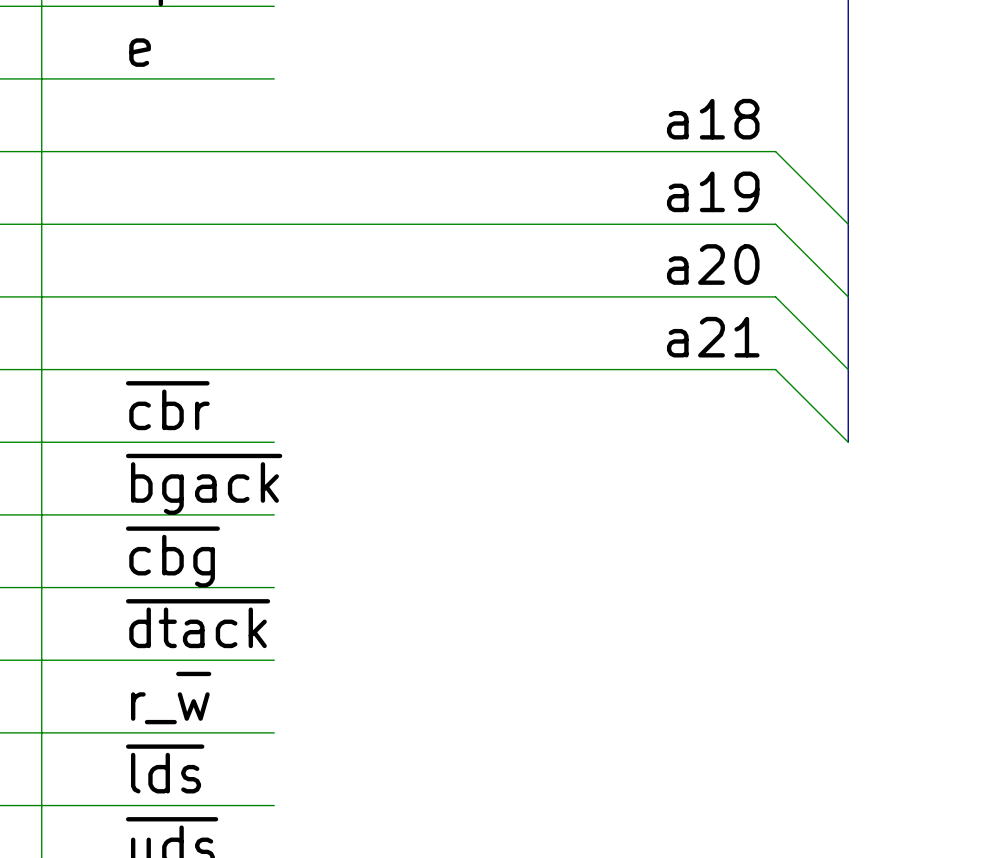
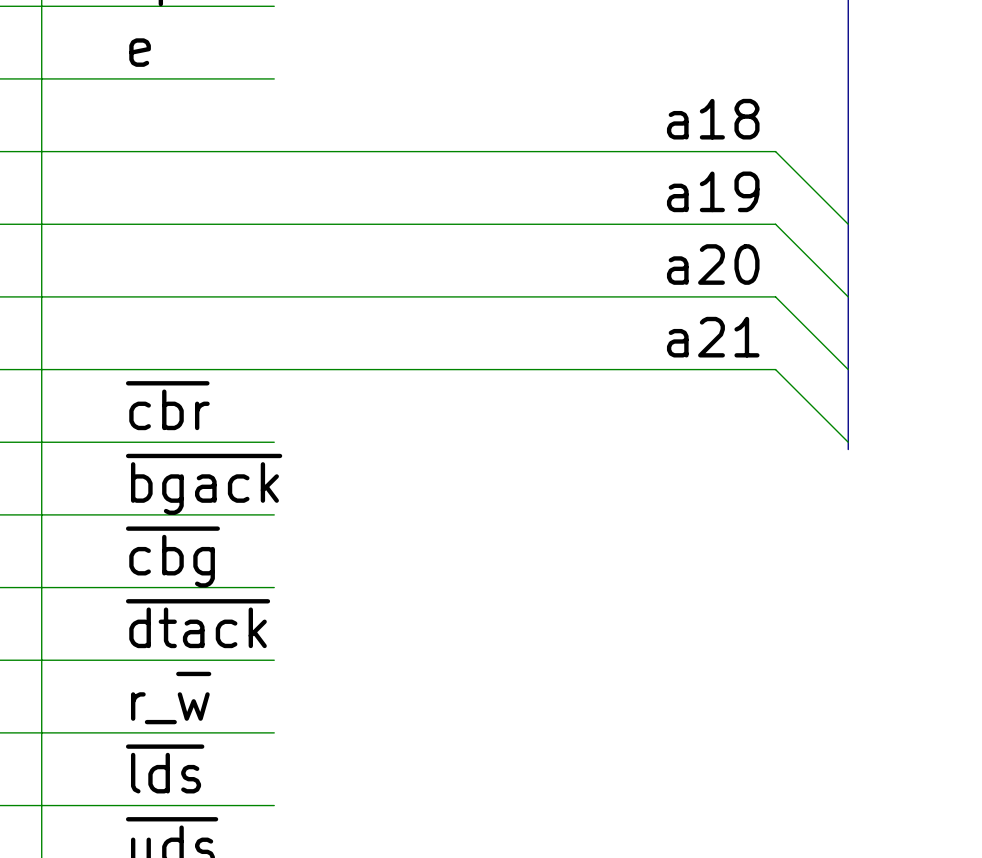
bus: none -> (848, 442) (848, 449)

